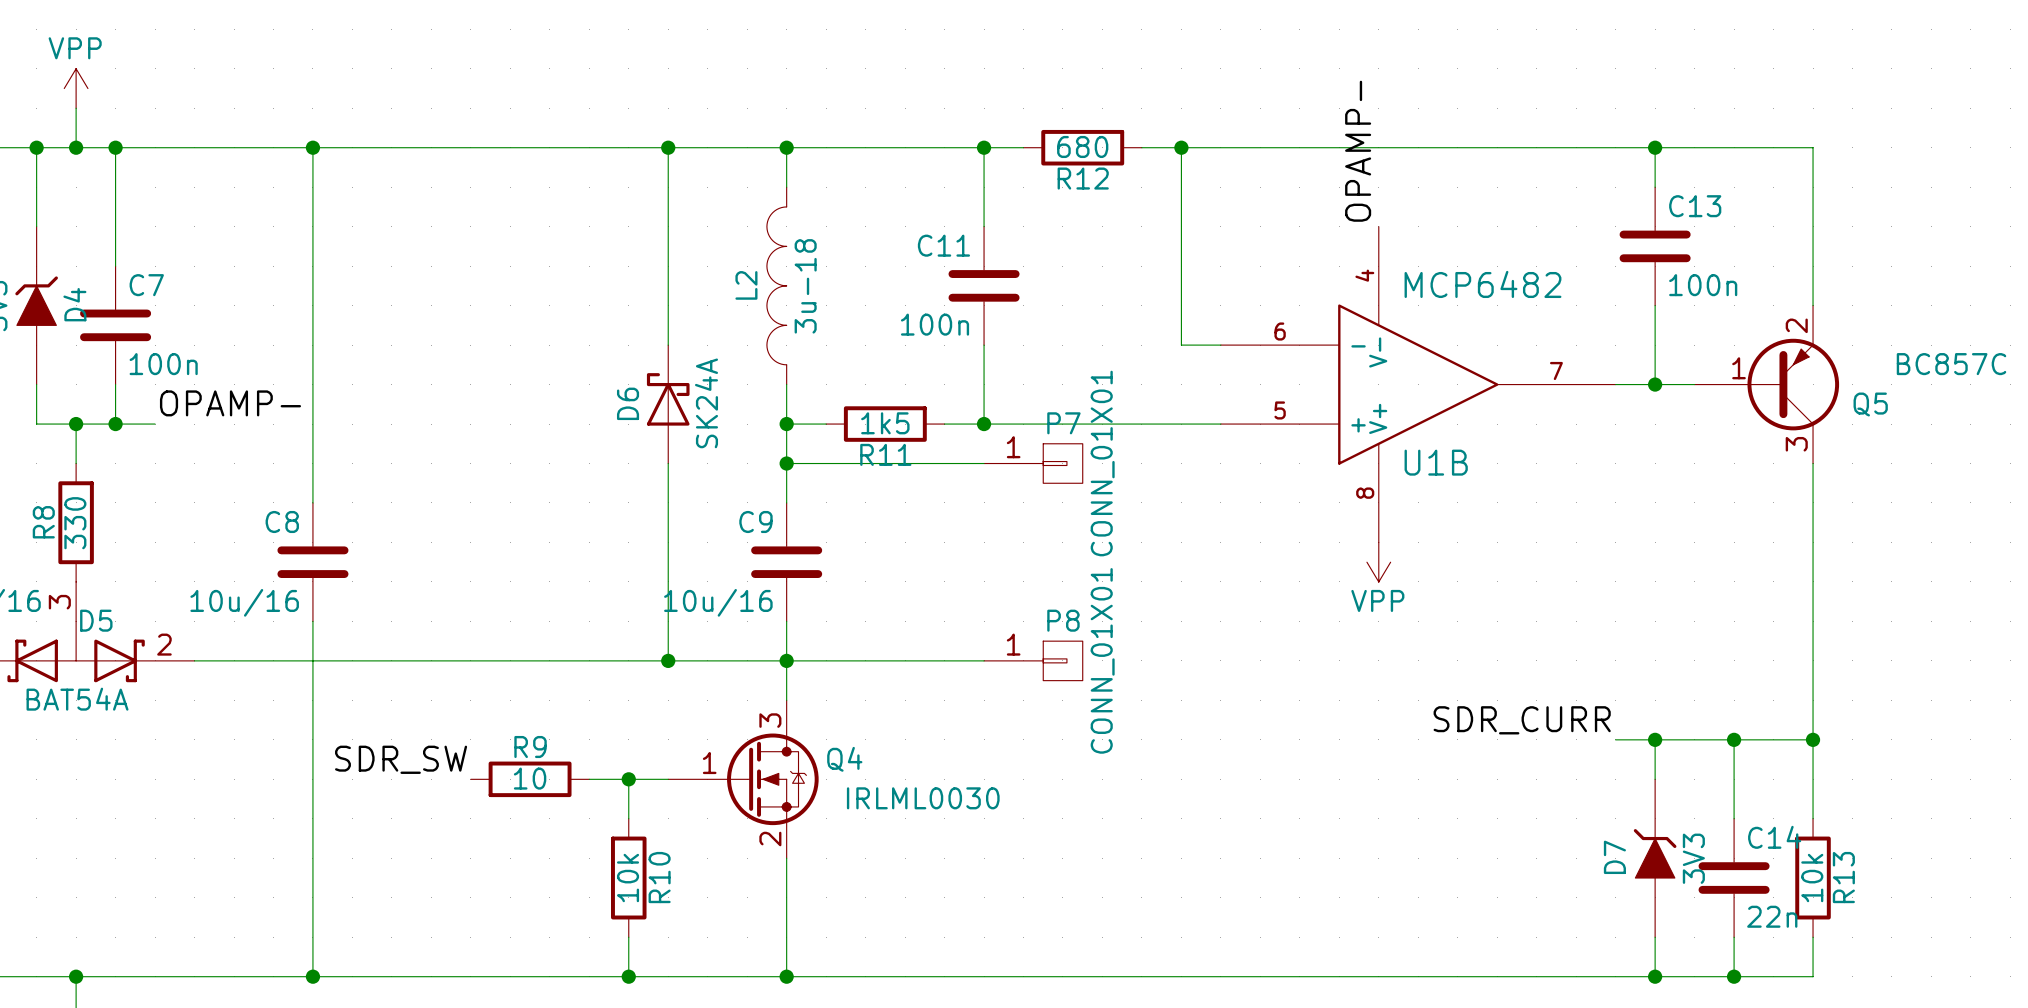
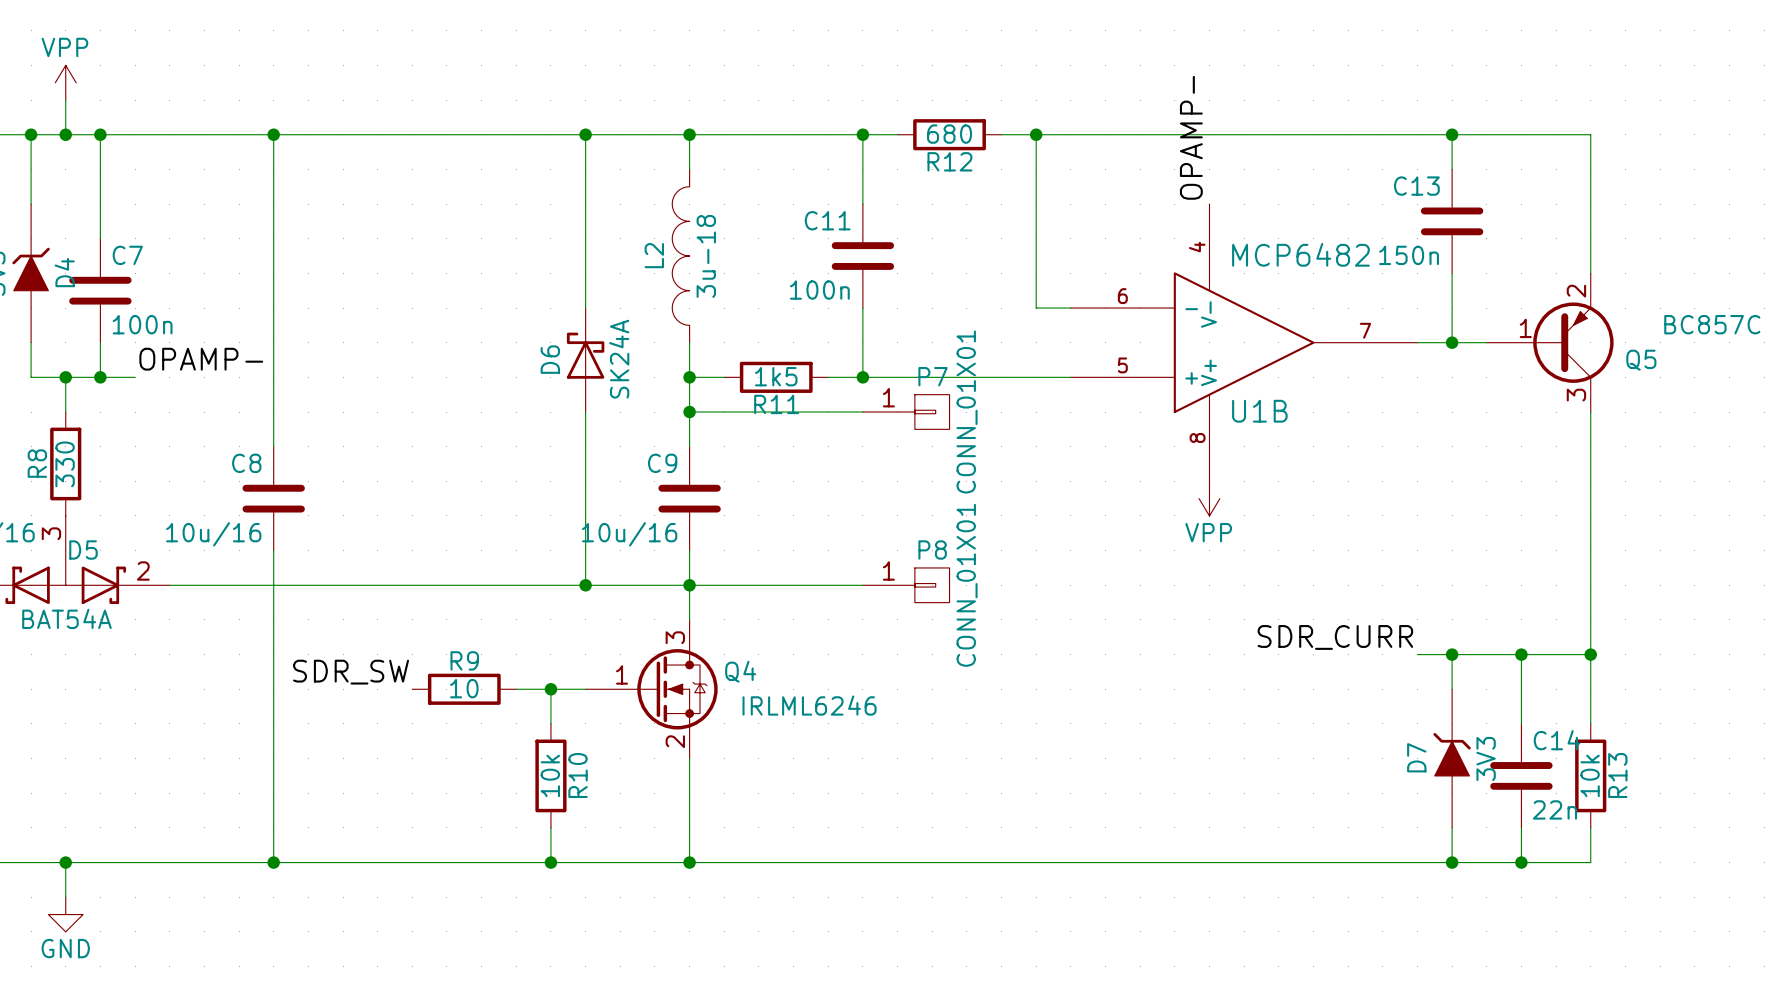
C13 name position: C13 (1695, 206) -> C13 (1416, 186)
C13 value: 100n (1703, 285) -> 150n (1409, 255)
Q4 value: IRLML0030 (923, 798) -> IRLML6246 (809, 705)

